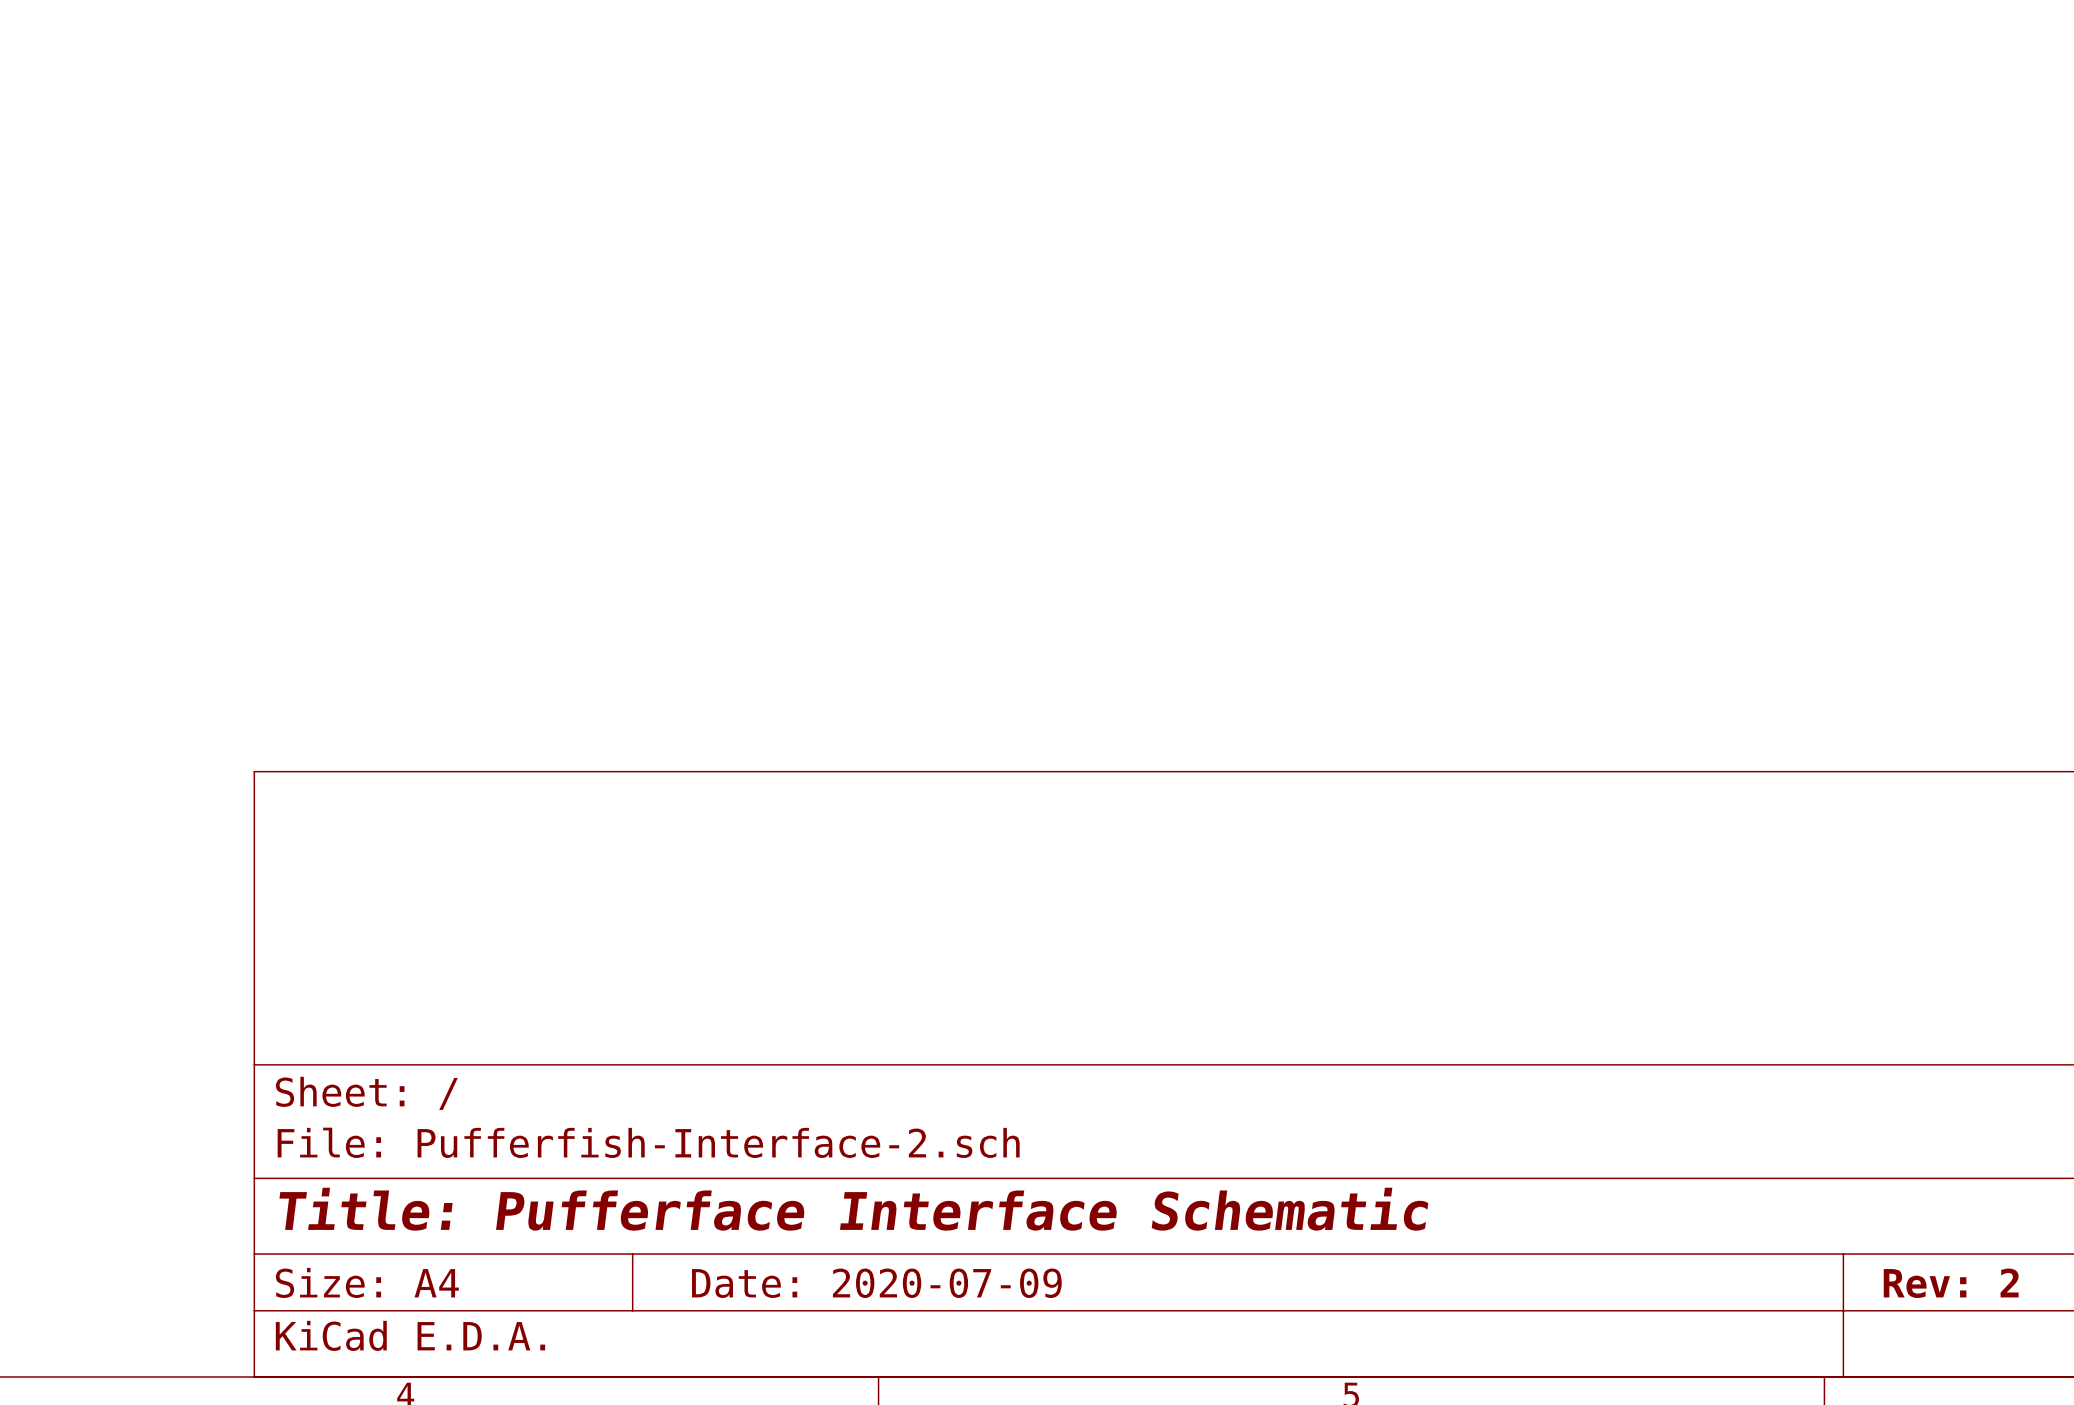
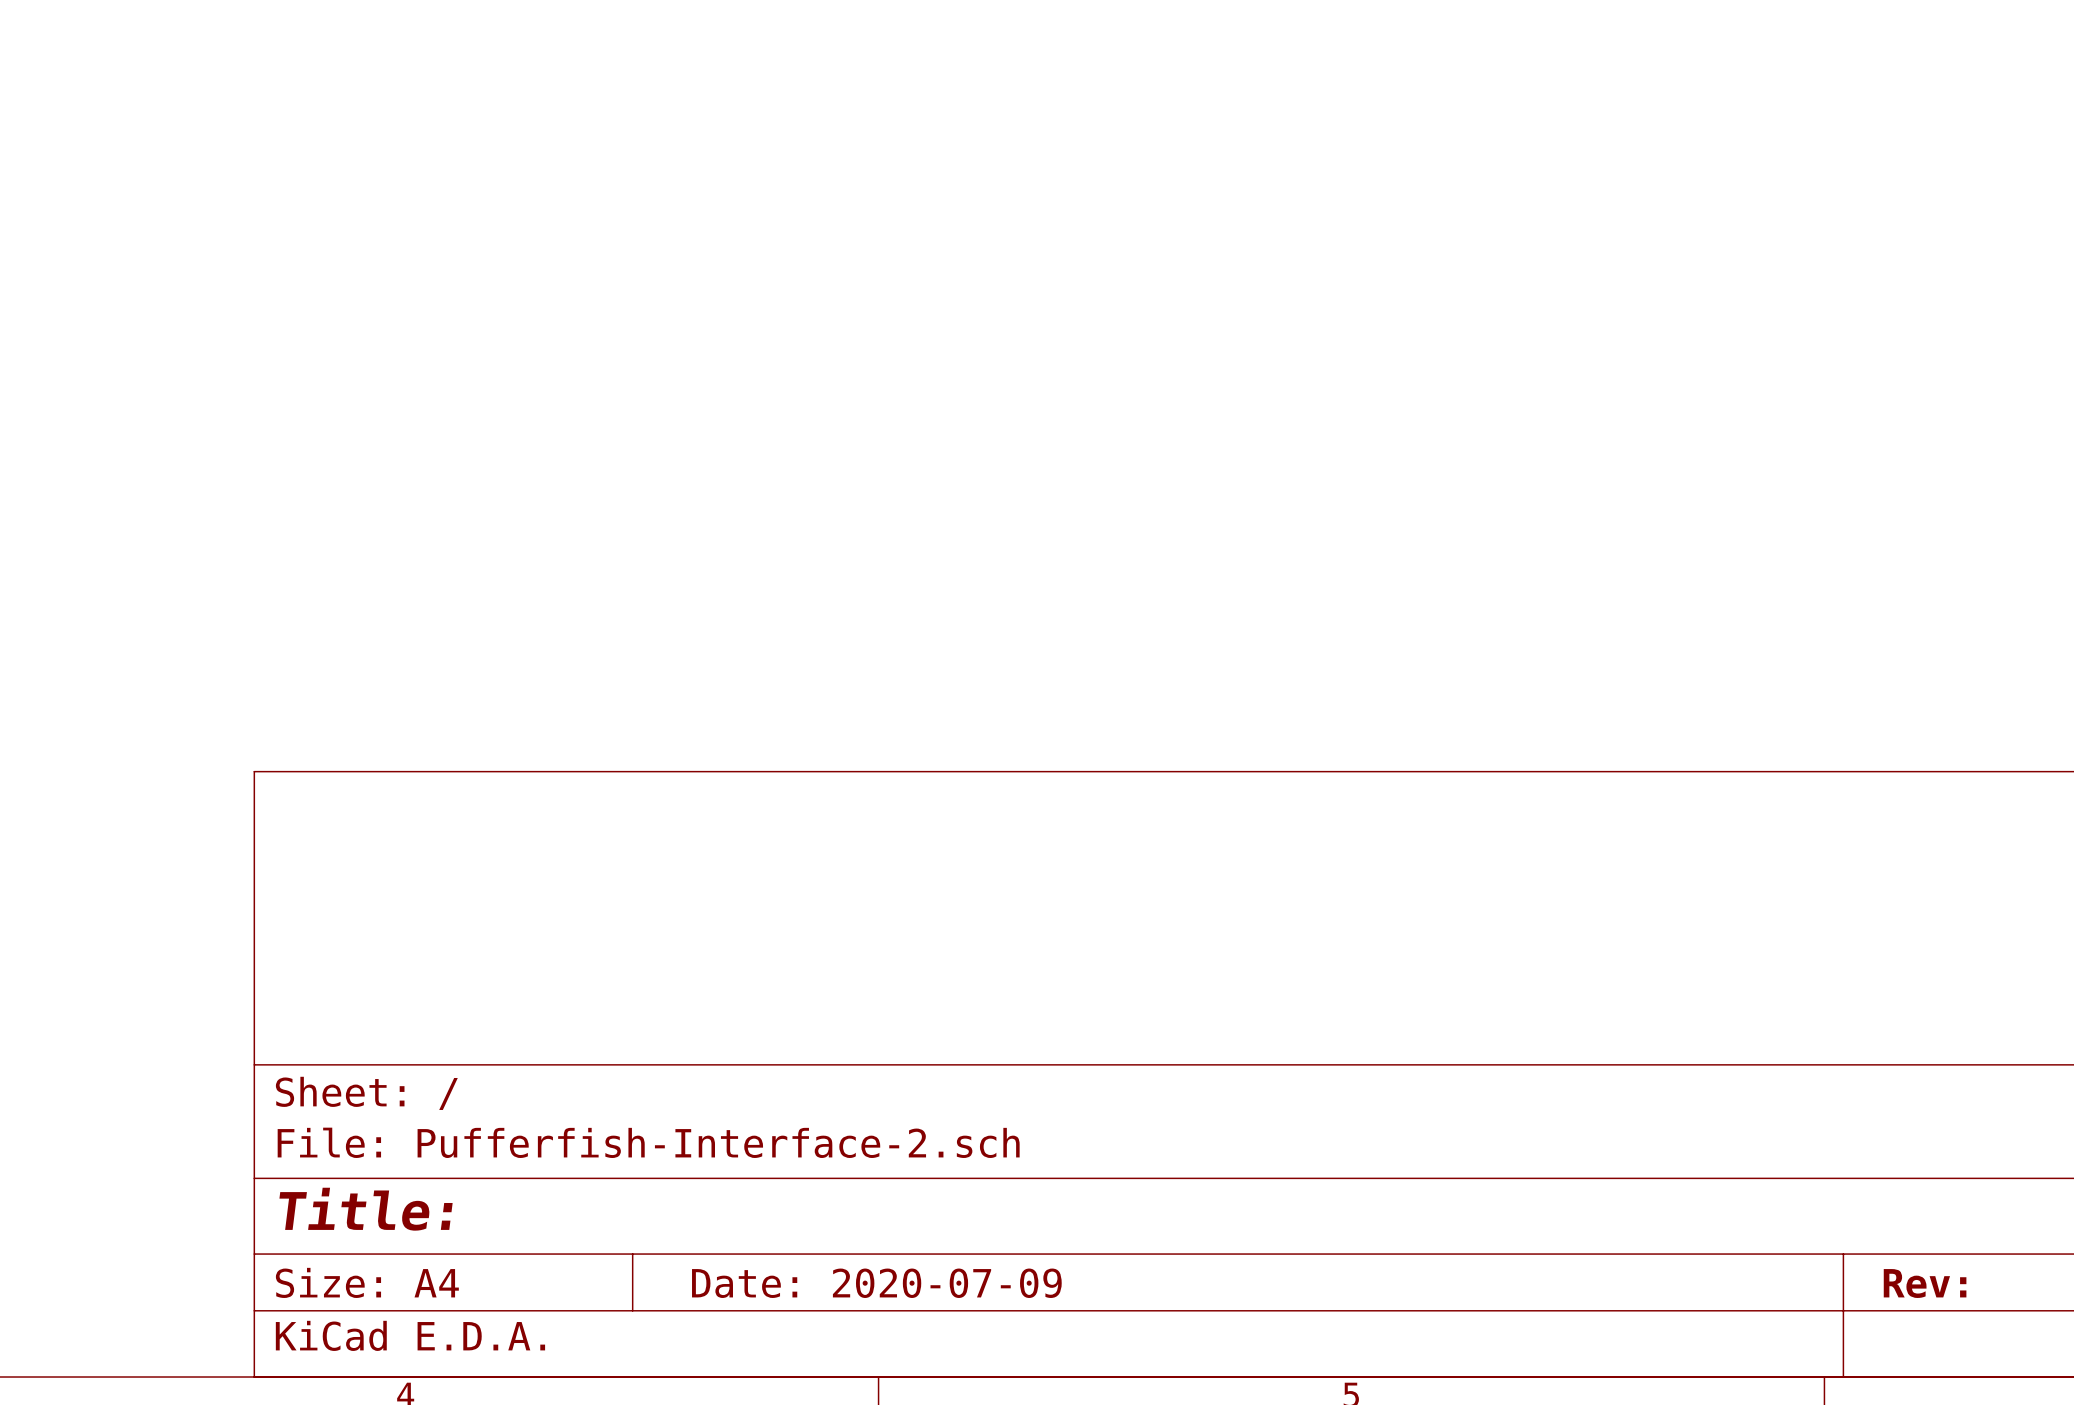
title block: Title: Pufferface Interface Schematic (853, 1209) -> Title: (366, 1209)
title block: Rev: 2 (1951, 1283) -> Rev: (1925, 1283)

